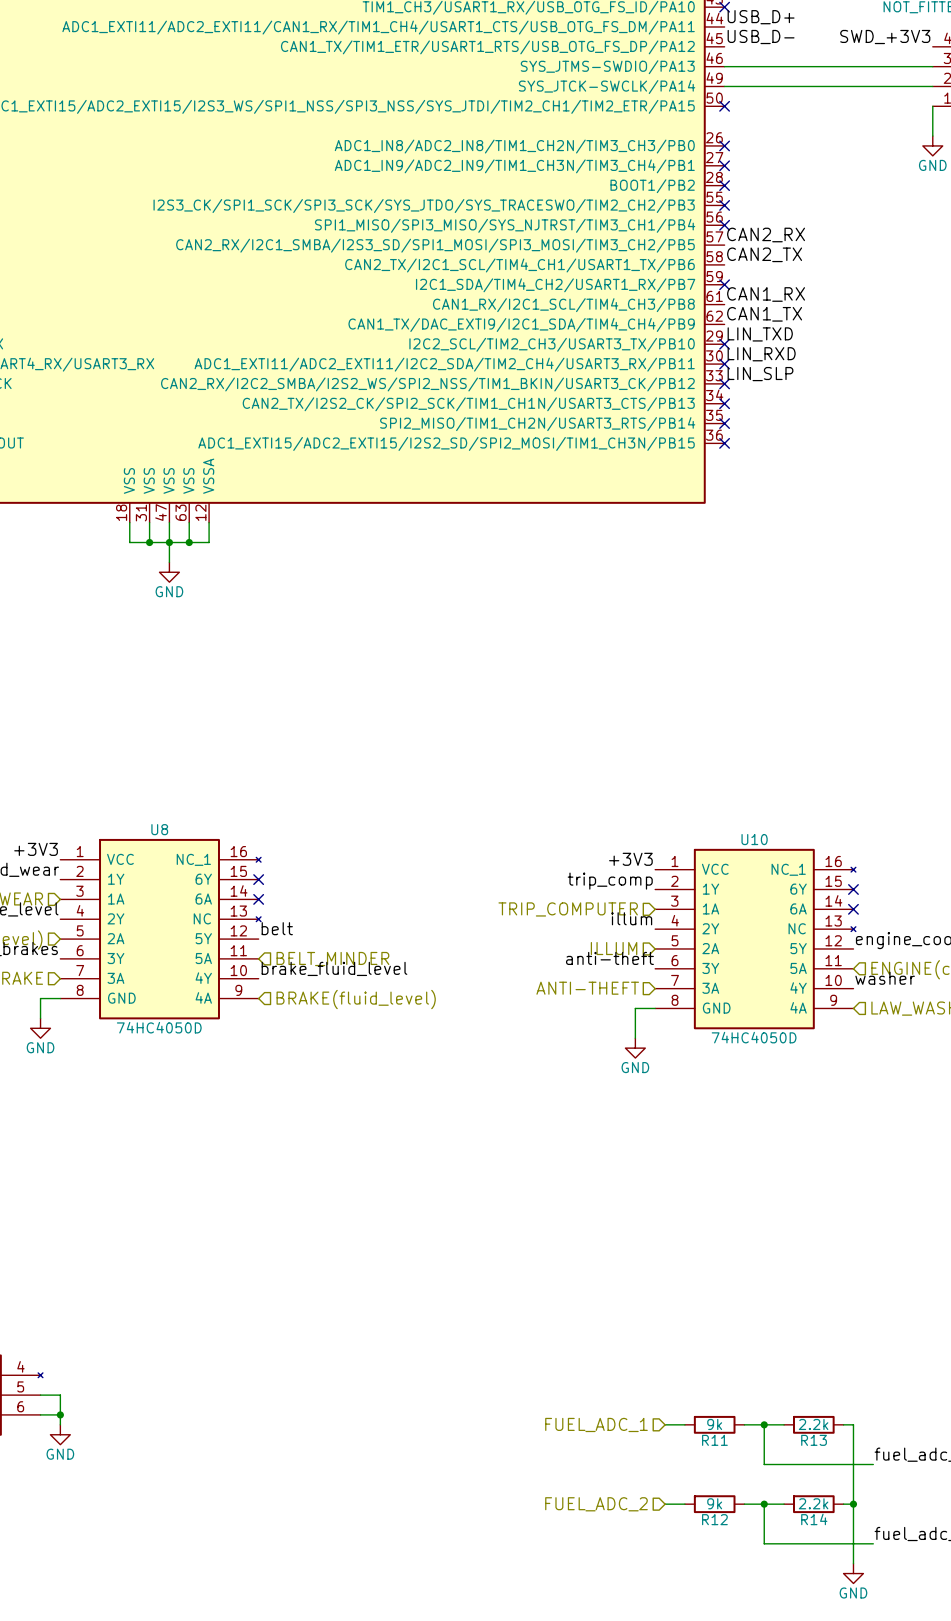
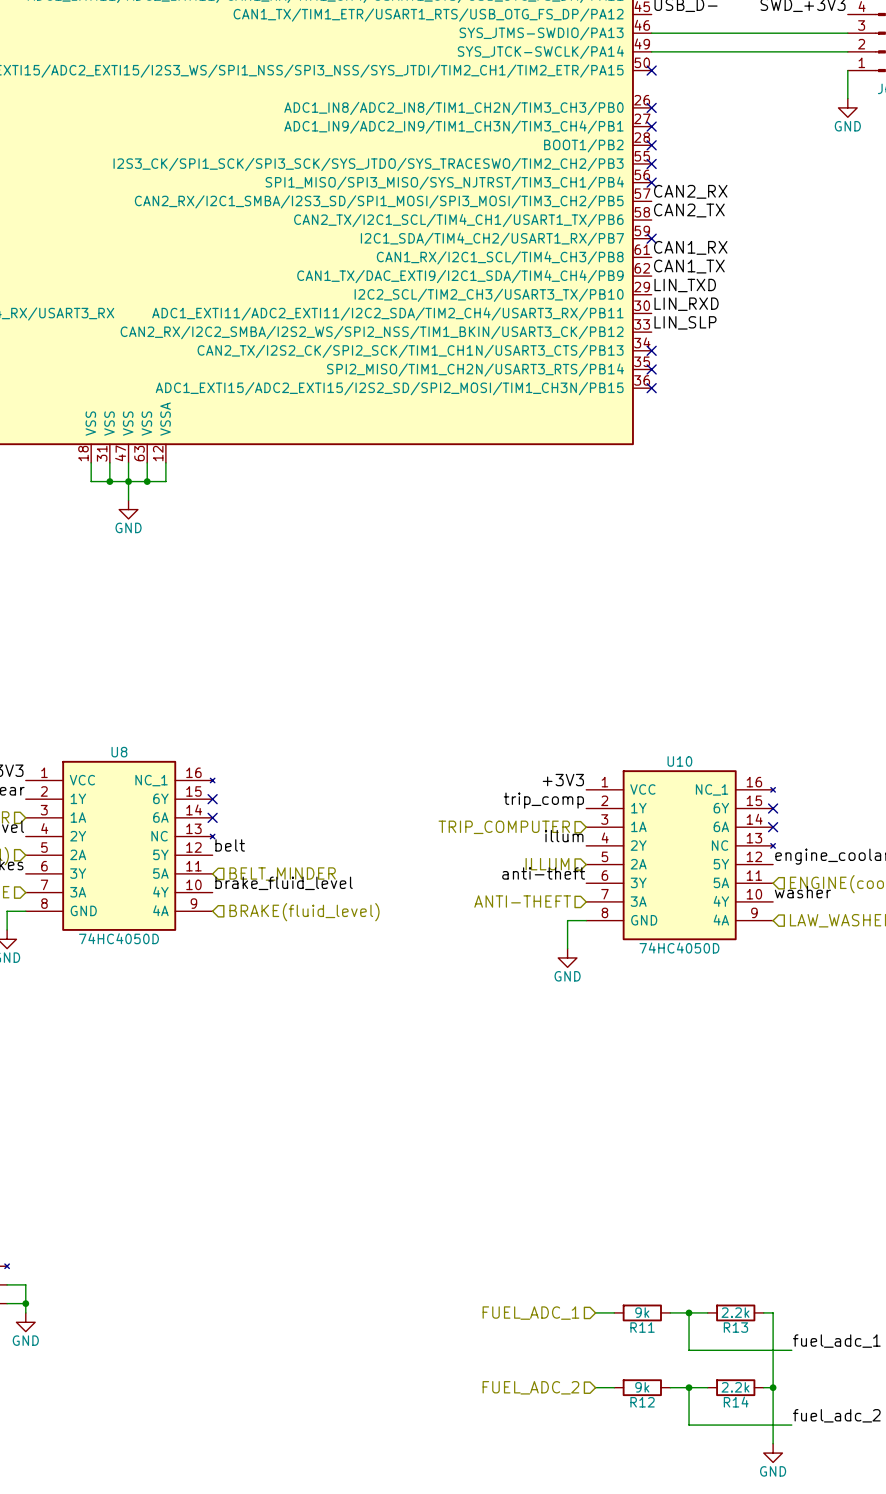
no-connect mark: (724, 344) -> none
no-connect mark: (724, 364) -> none
no-connect mark: (724, 383) -> none

